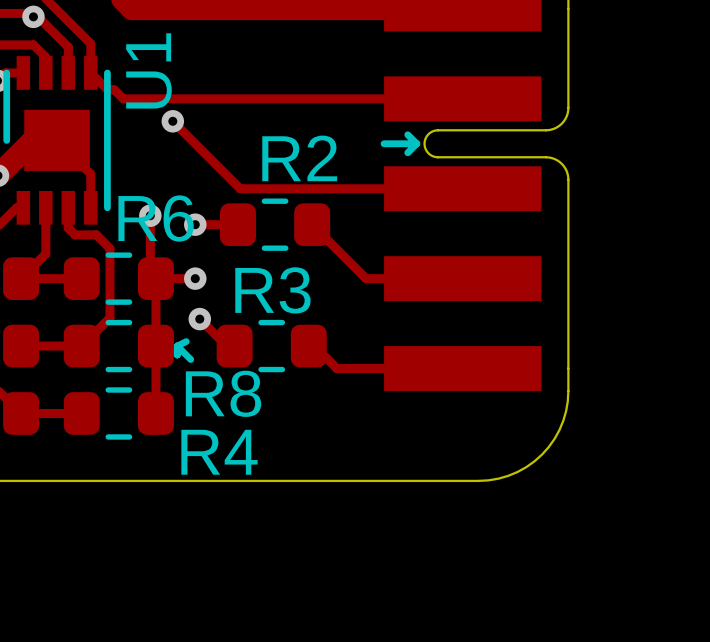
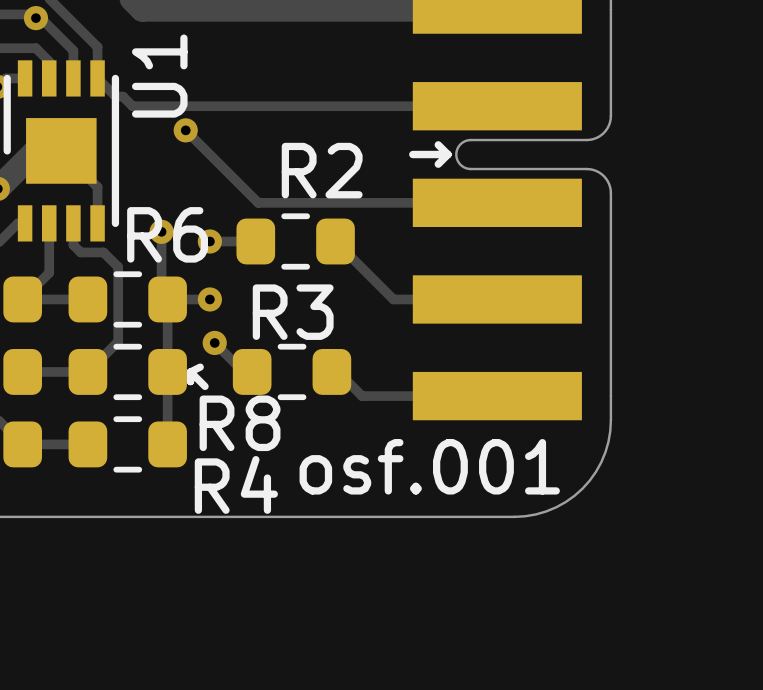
text: none -> osf.001 (429, 466)

